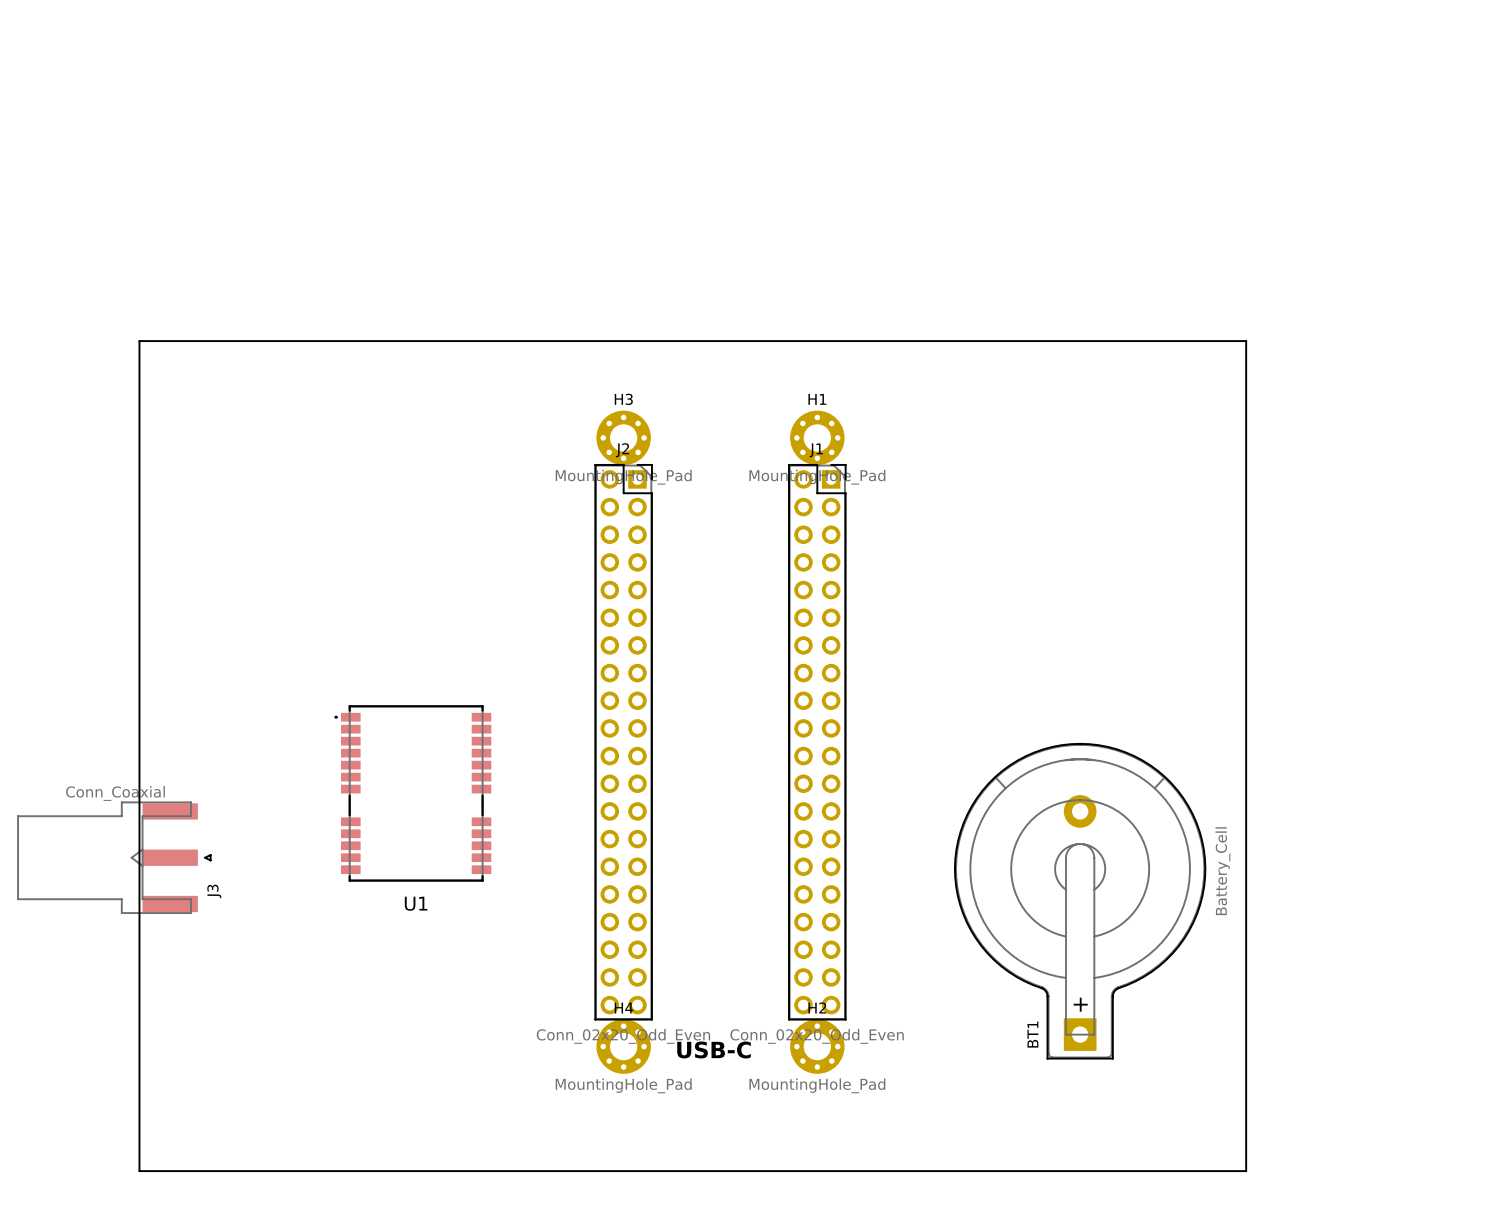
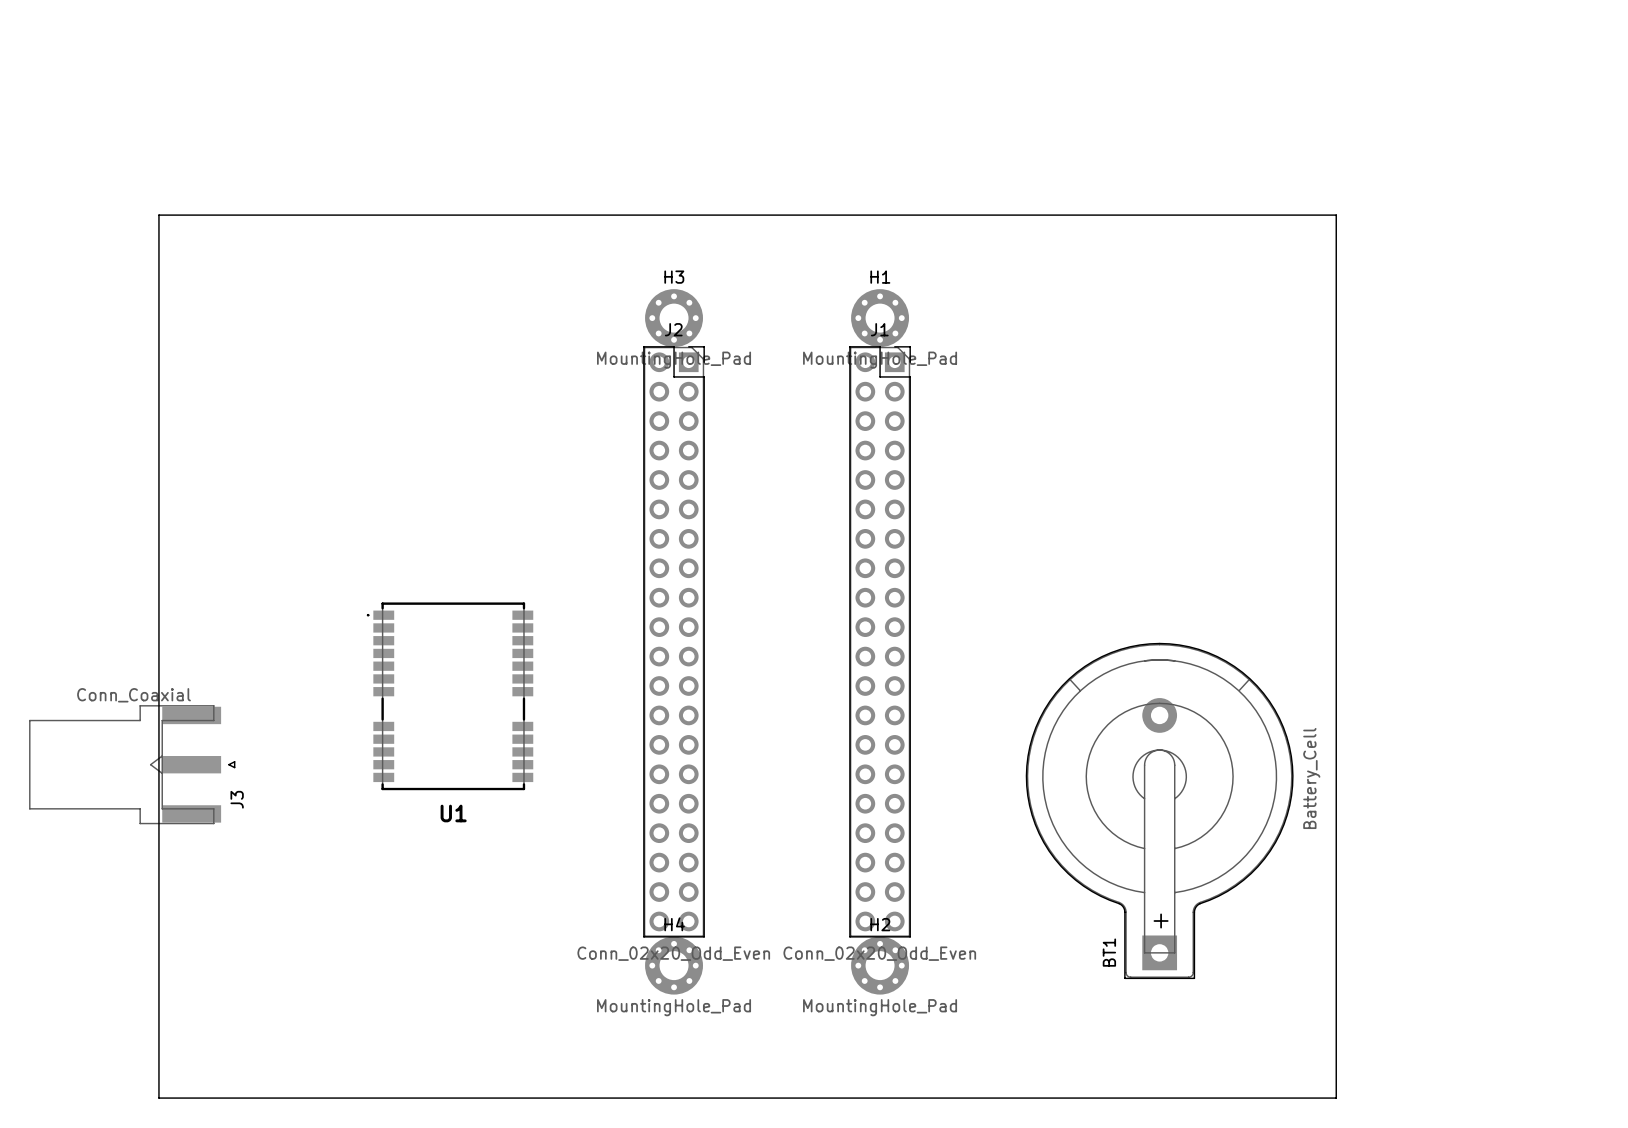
text: USB-C (714, 1049) -> none

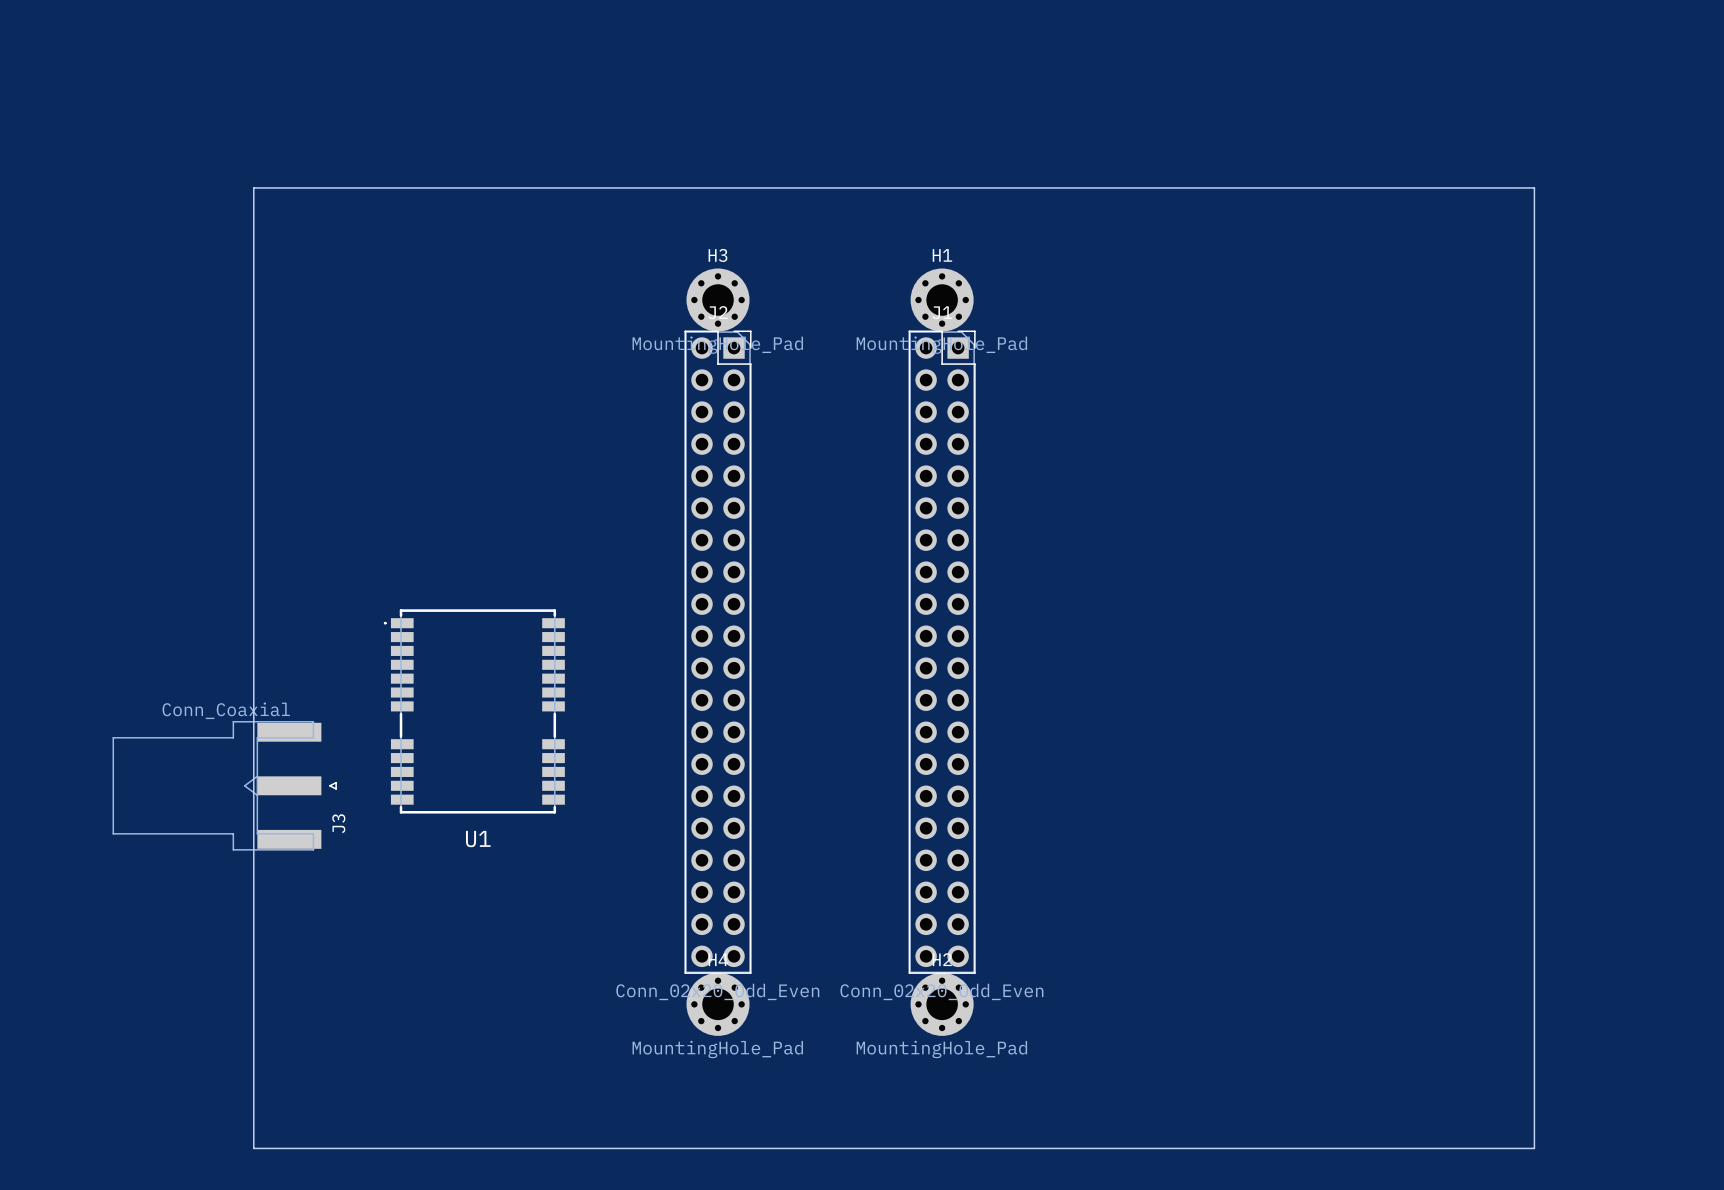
board edge: (247, 215) (158, 215) (158, 1098) (247, 1098) -> (253, 187) (253, 1148)
board edge: (1336, 215) (1336, 1098) -> (1438, 187) (1534, 187) (1534, 1148) (1438, 1148)
J3 position: (132, 764) -> (224, 785)
BT1: Battery_Cell (1159, 810) -> none

